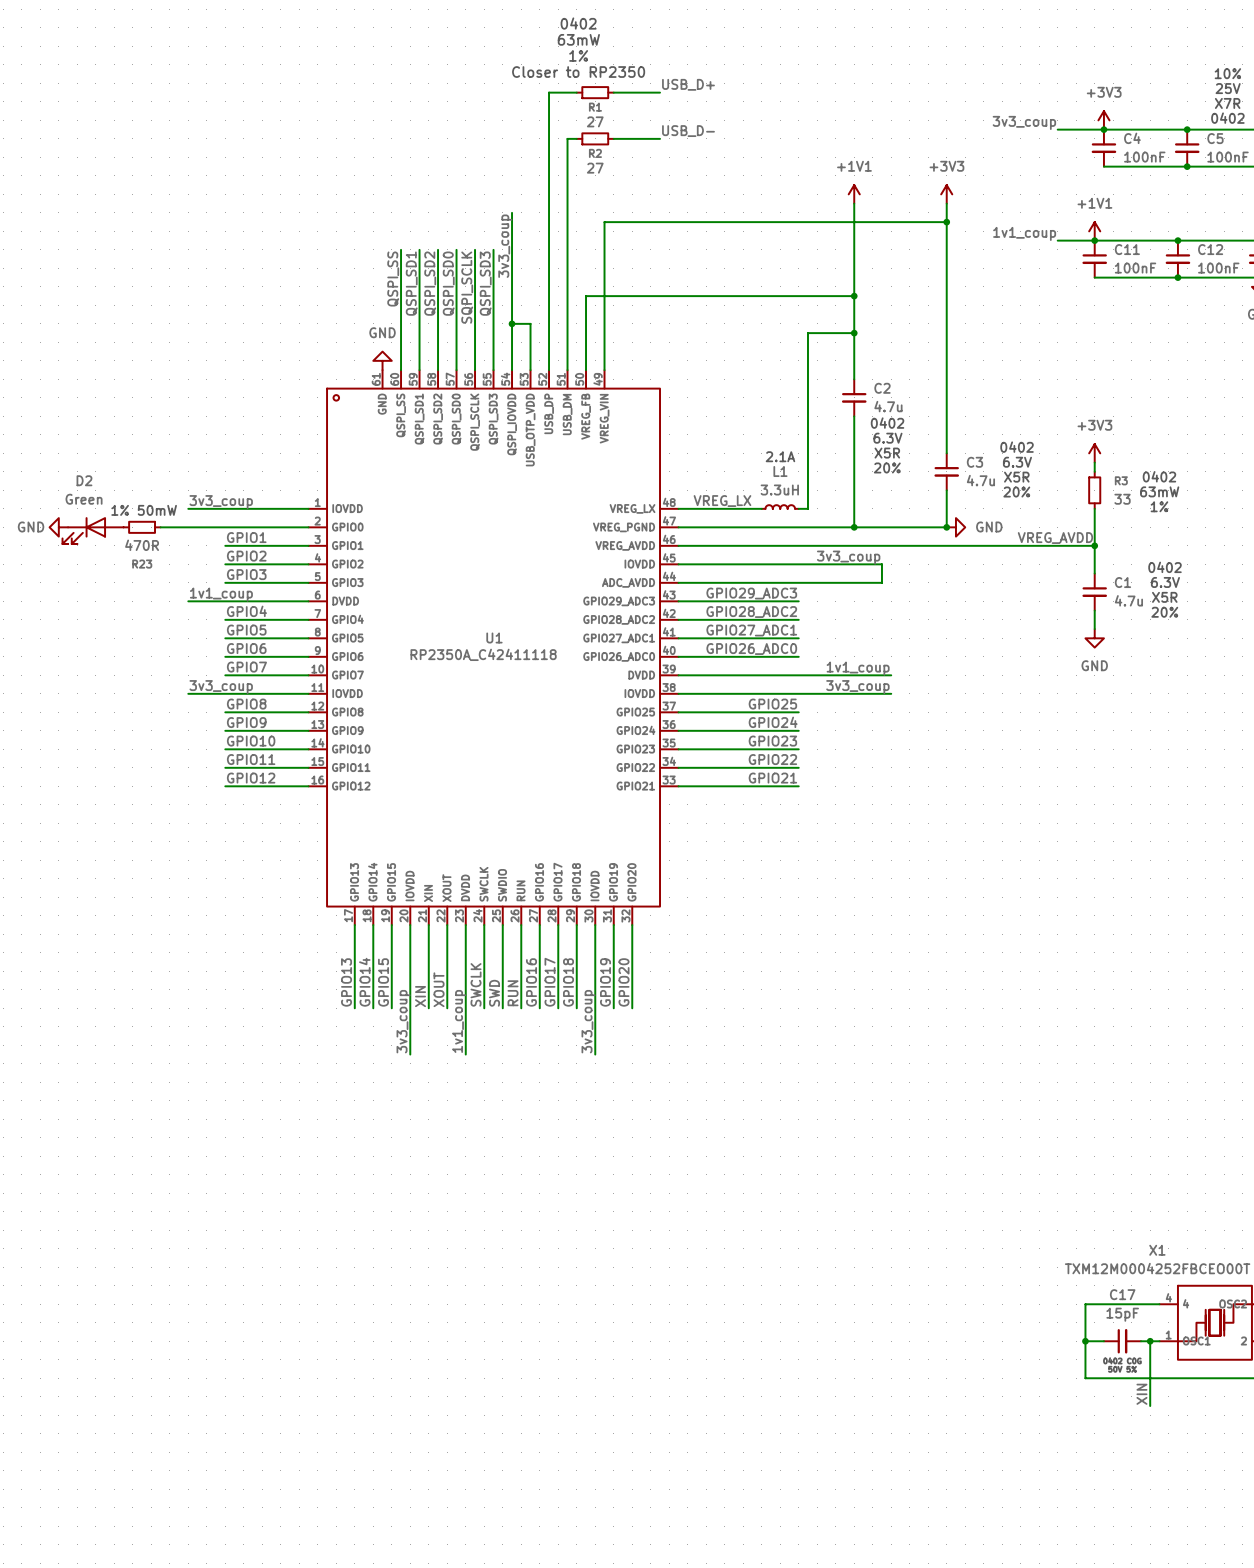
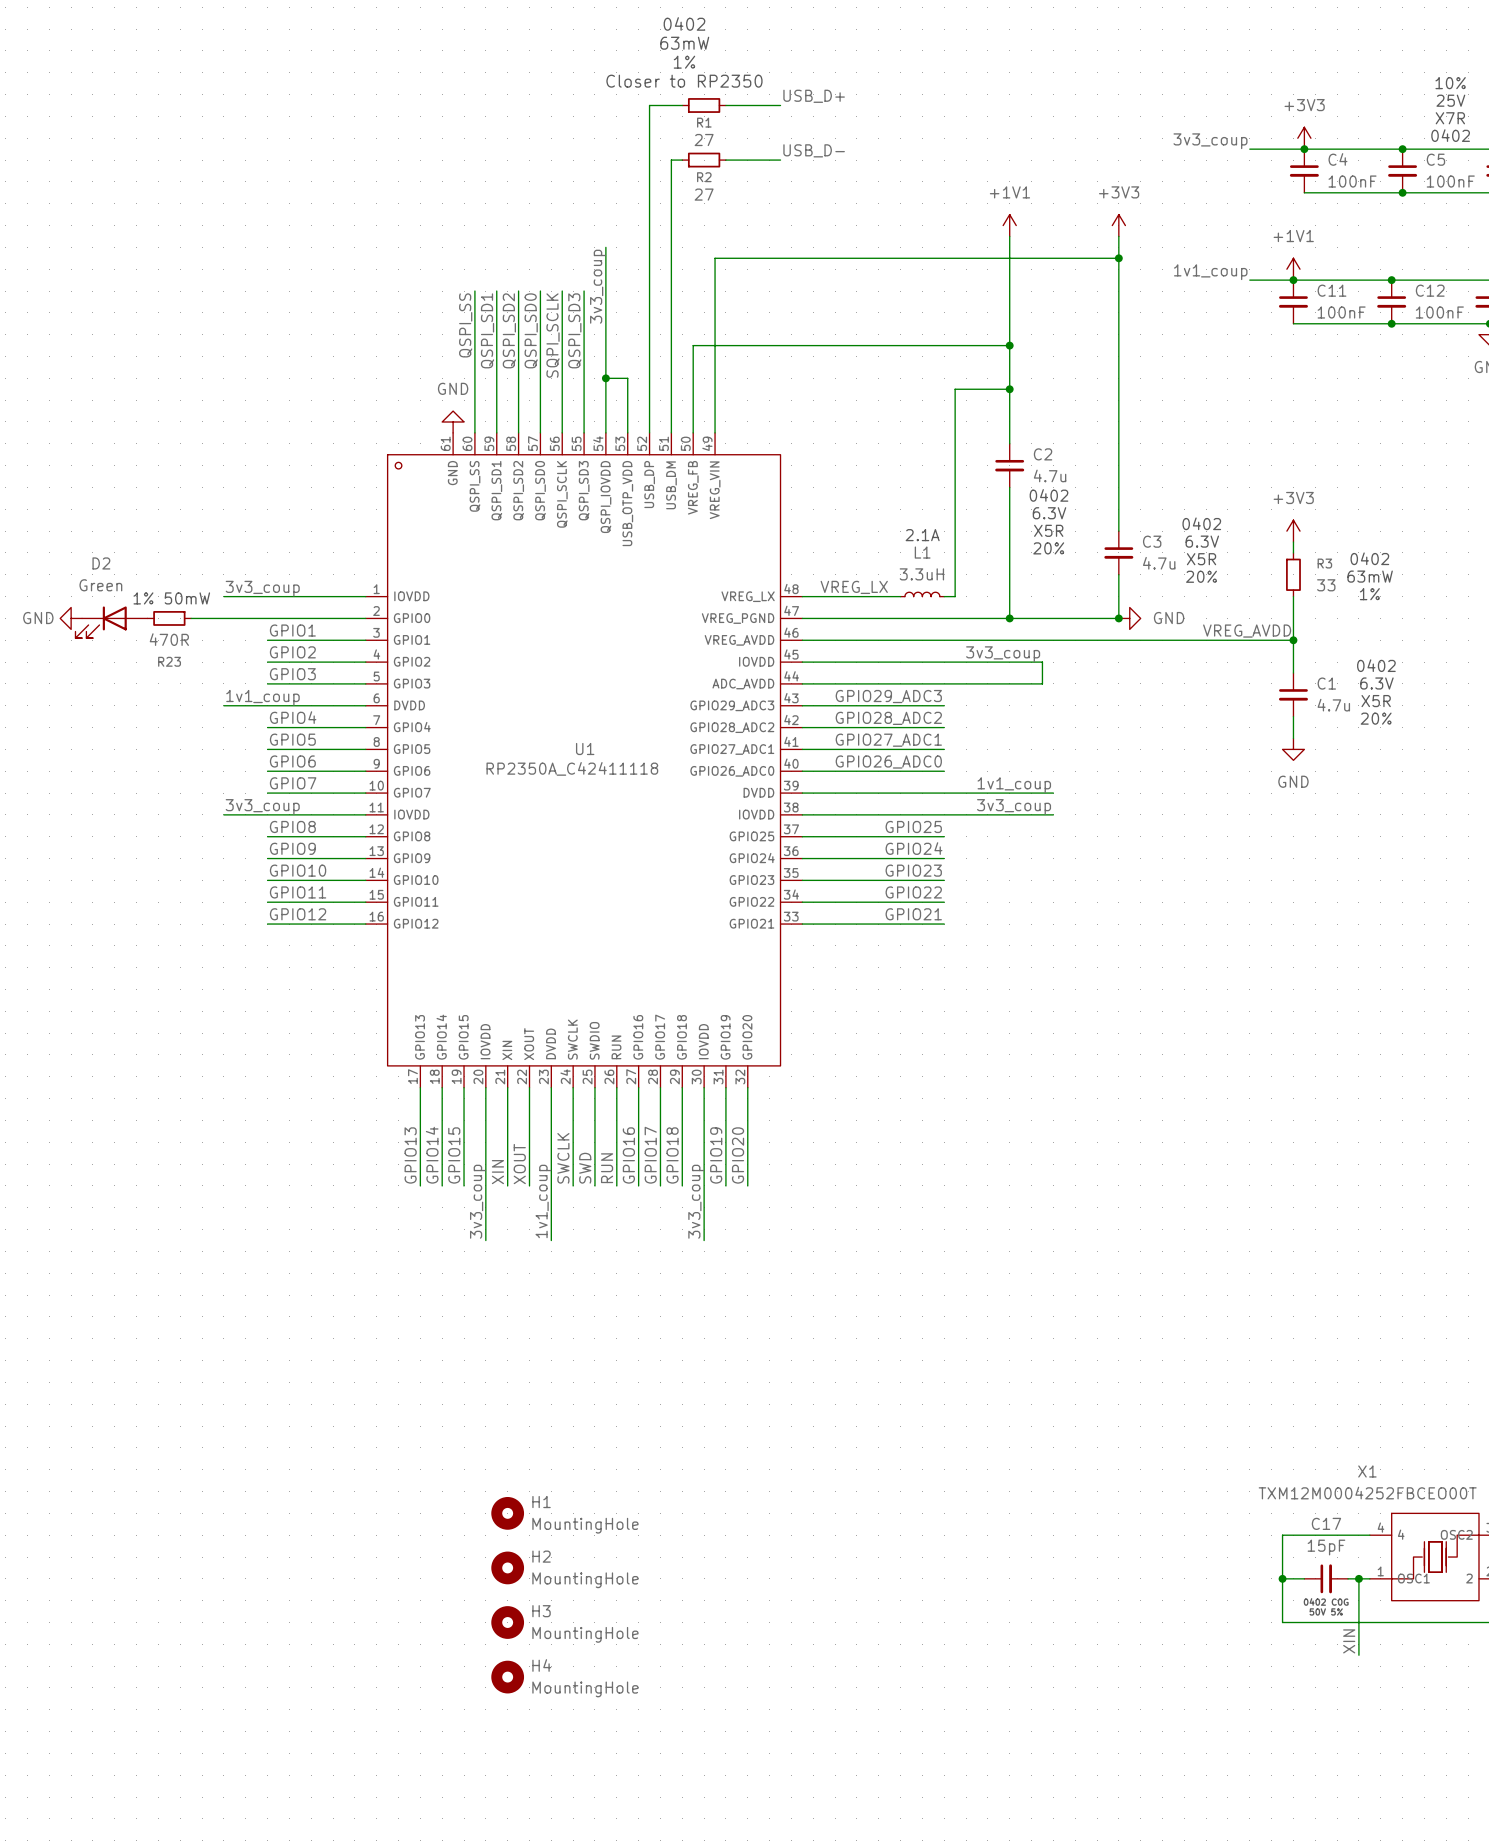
H1: none -> MountingHole (507, 1513)
H2: none -> MountingHole (507, 1567)
H3: none -> MountingHole (507, 1622)
H4: none -> MountingHole (507, 1677)

